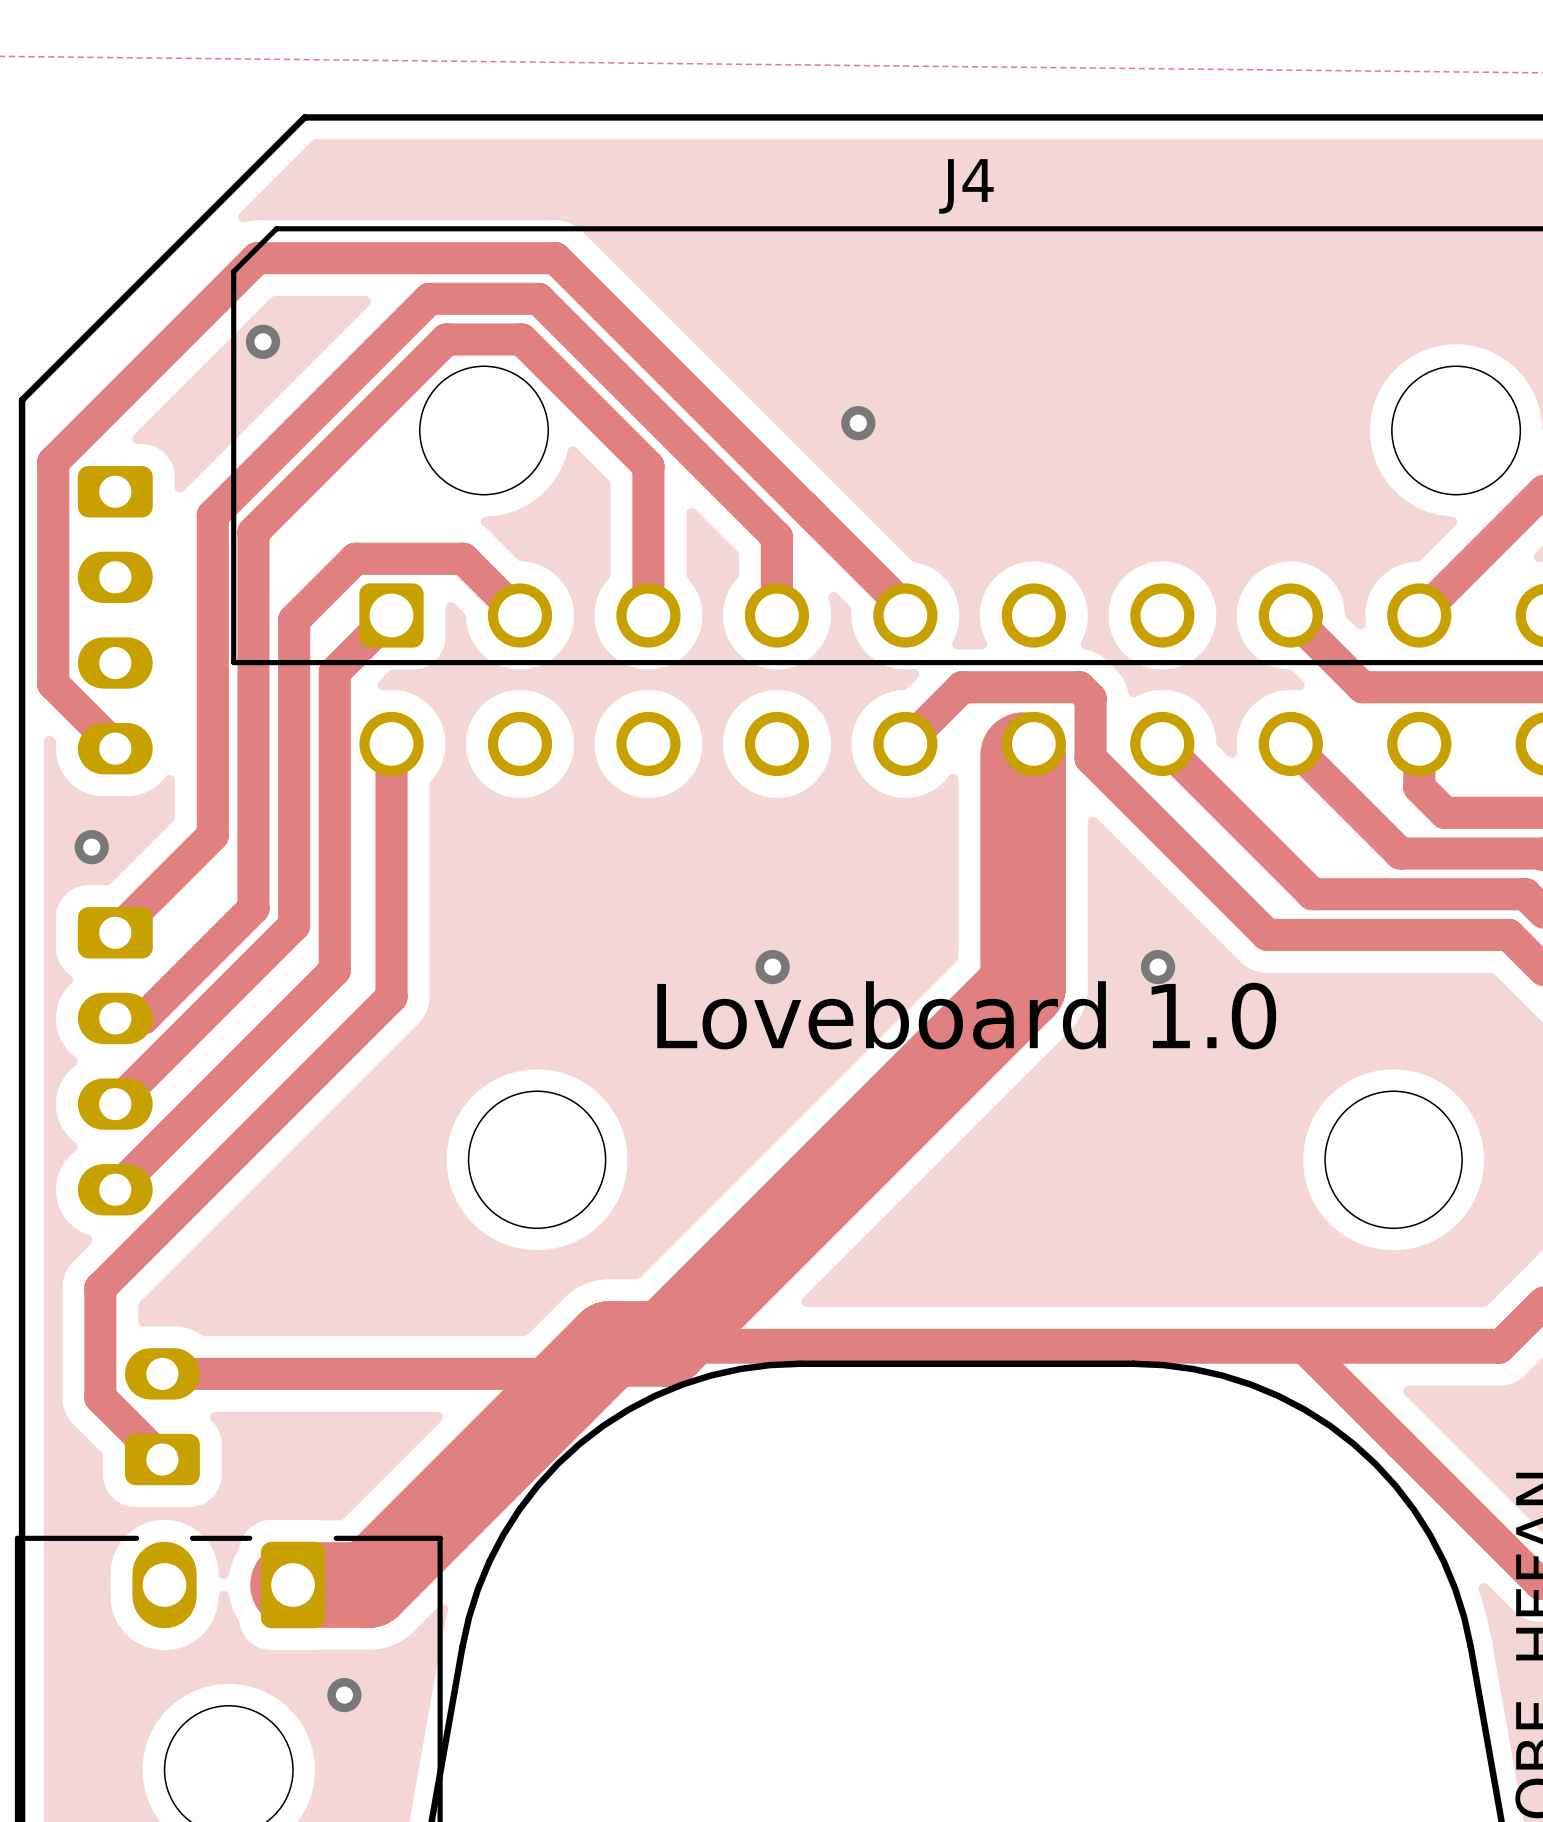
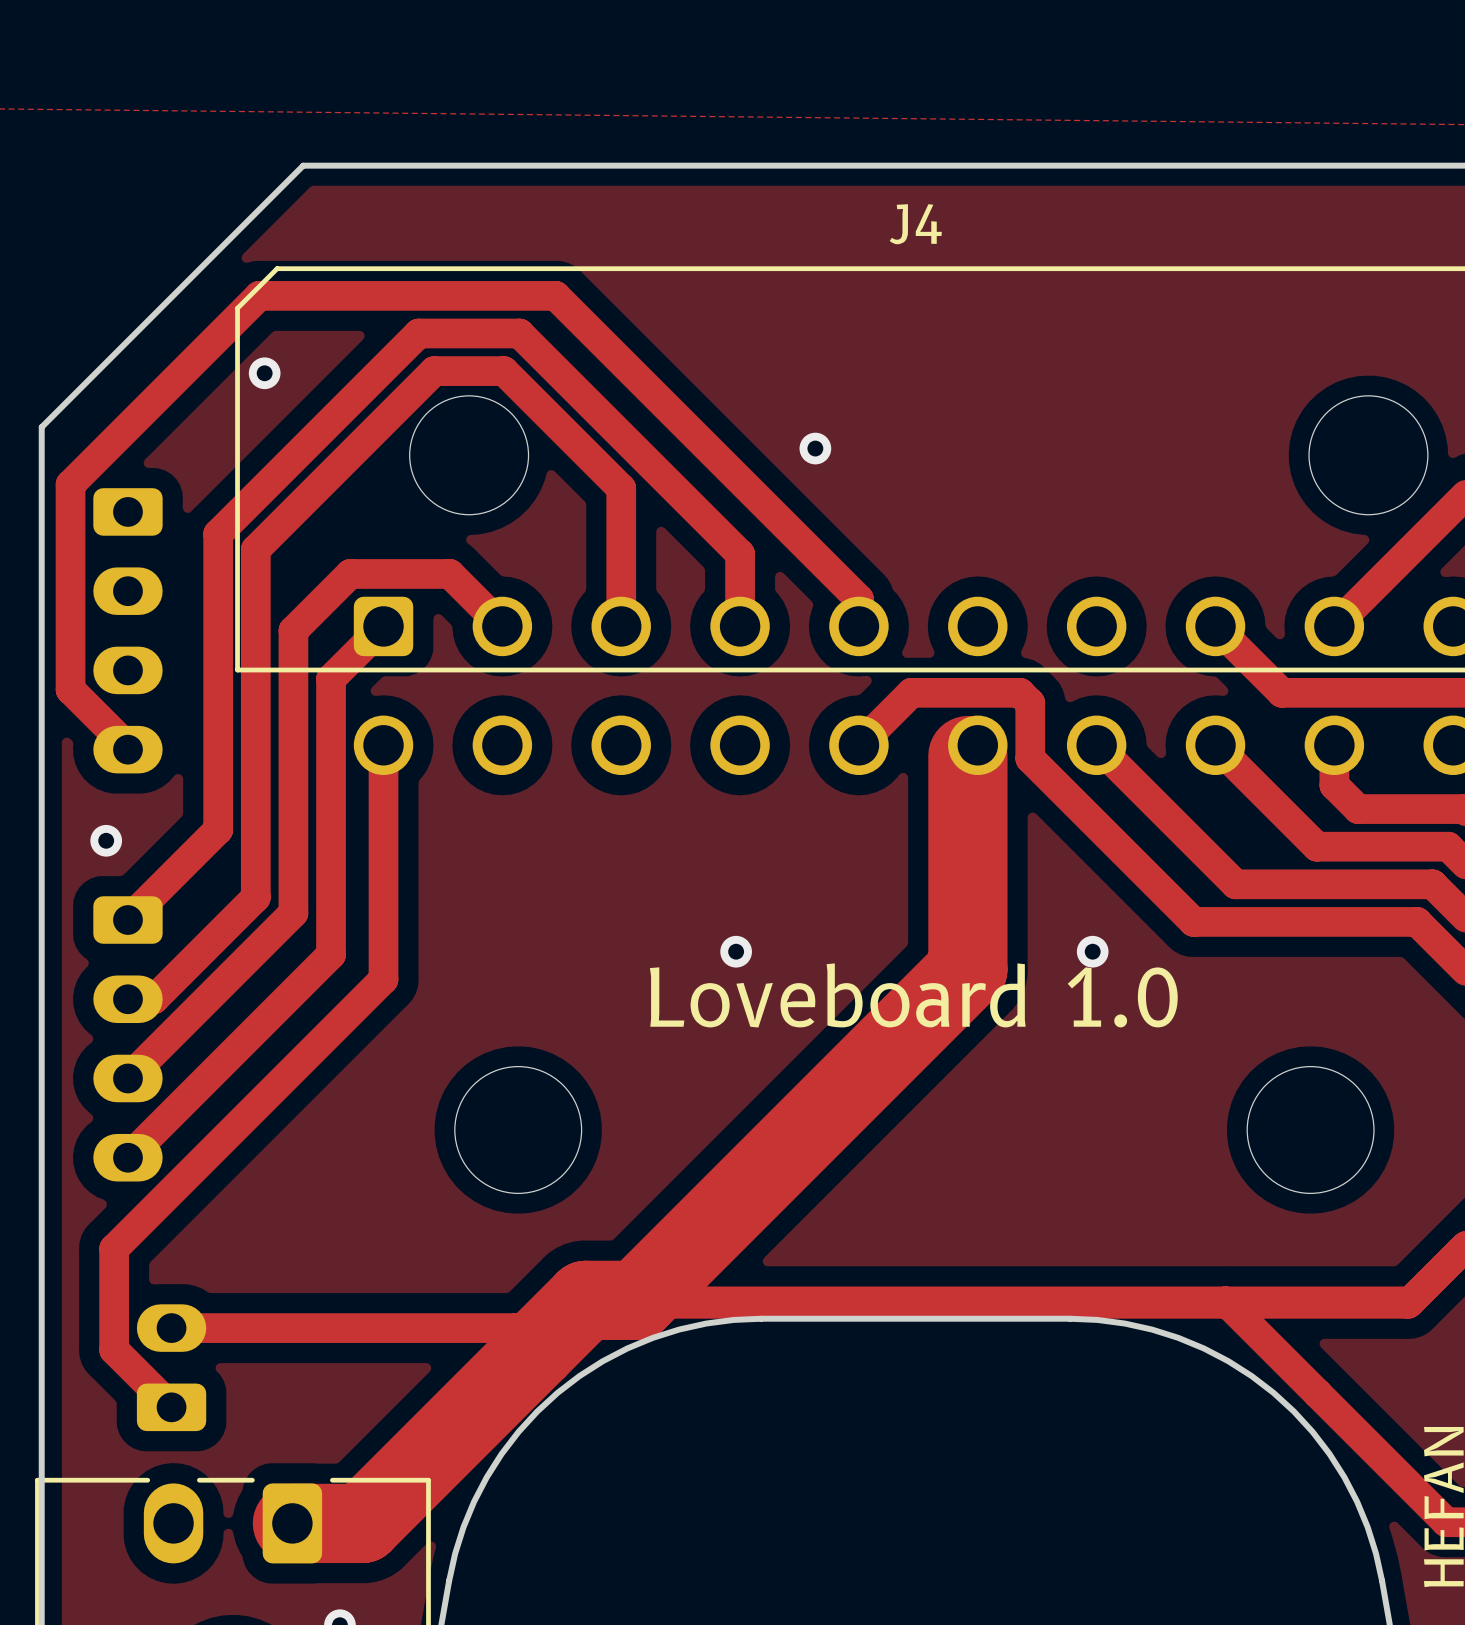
track: (555, 258) (905, 608) -> (535, 295) (555, 295) (858, 599) (858, 619)

